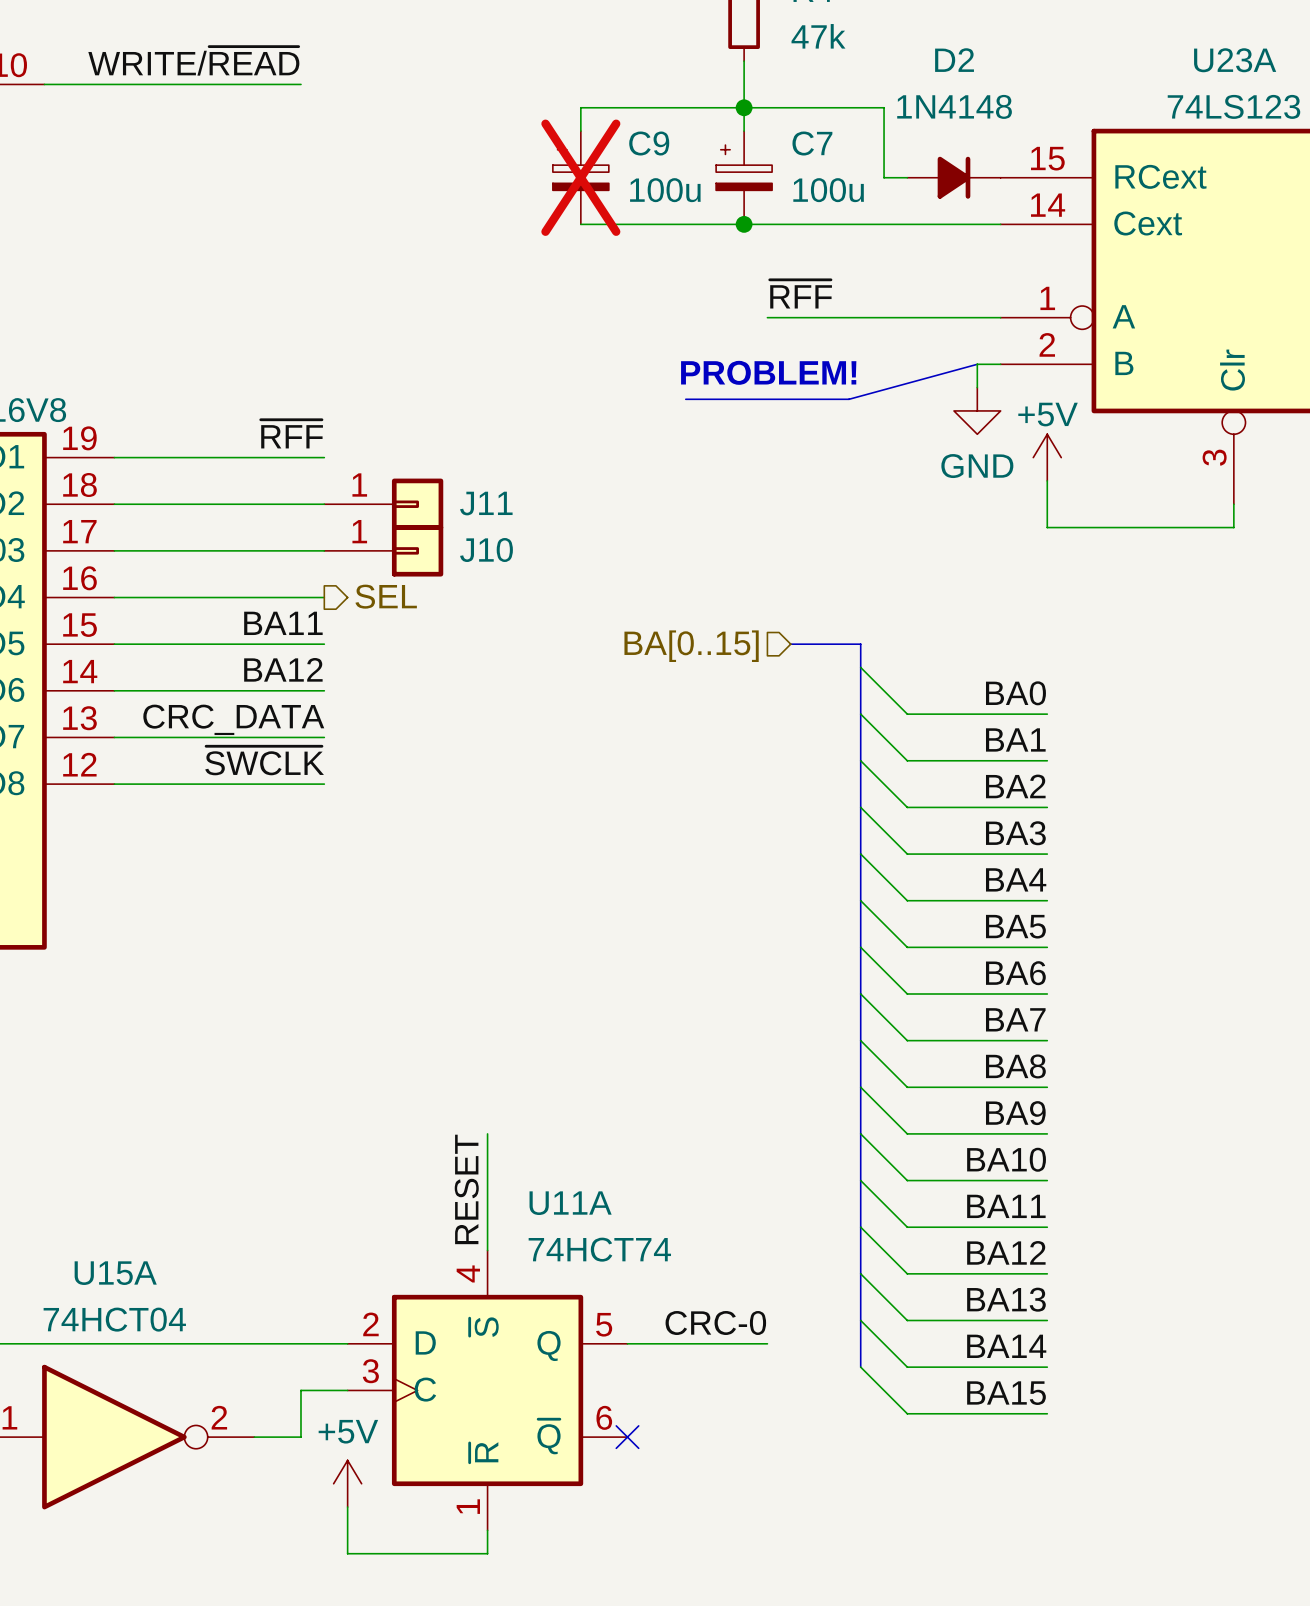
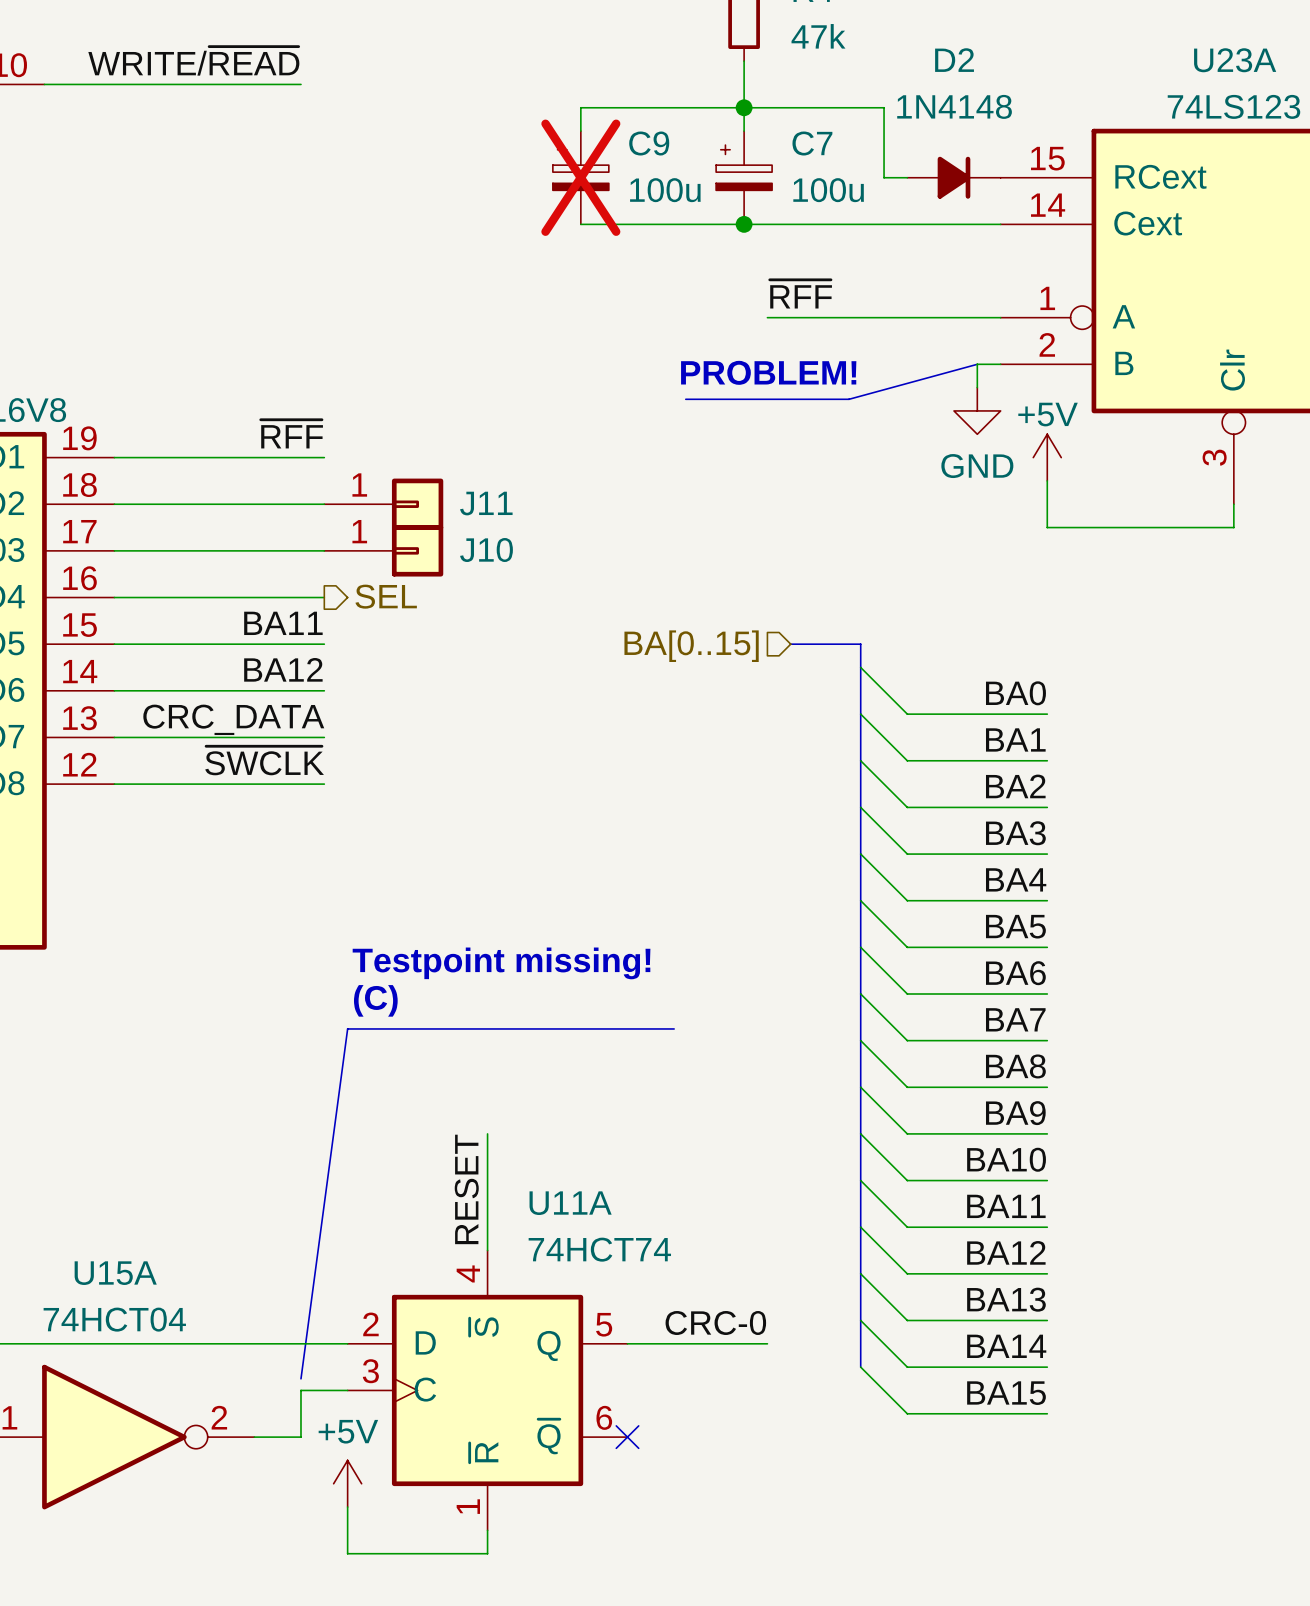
text: none -> Testpoint missing! (501, 963)
text: none -> (C) (375, 1000)
line: none -> (674, 1028) (347, 1028) (300, 1378)

